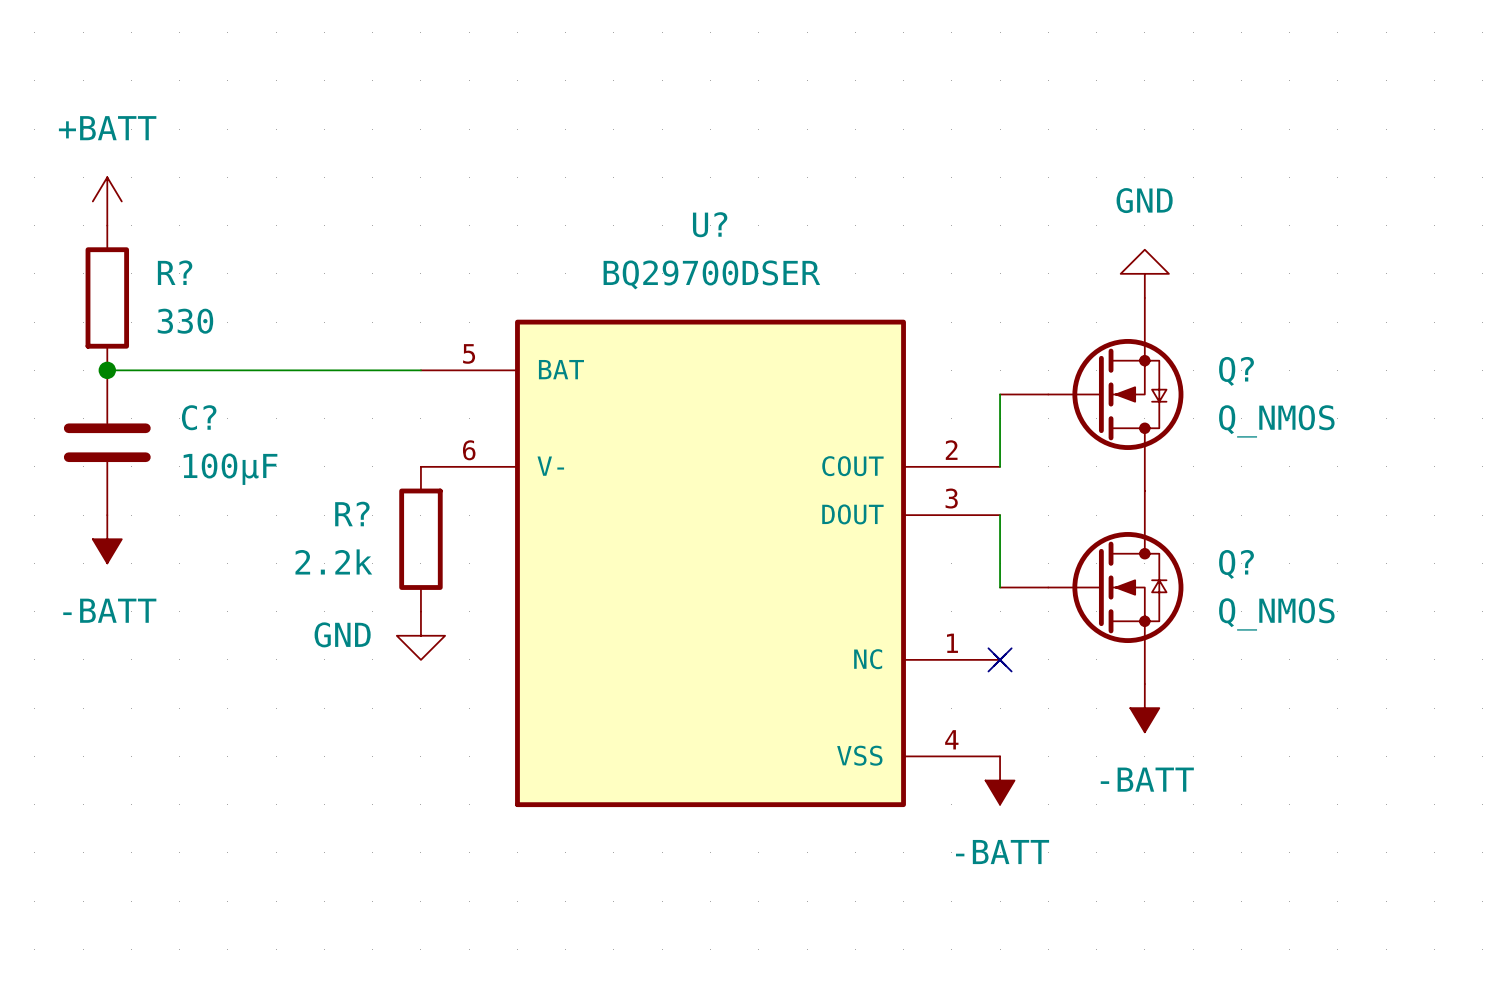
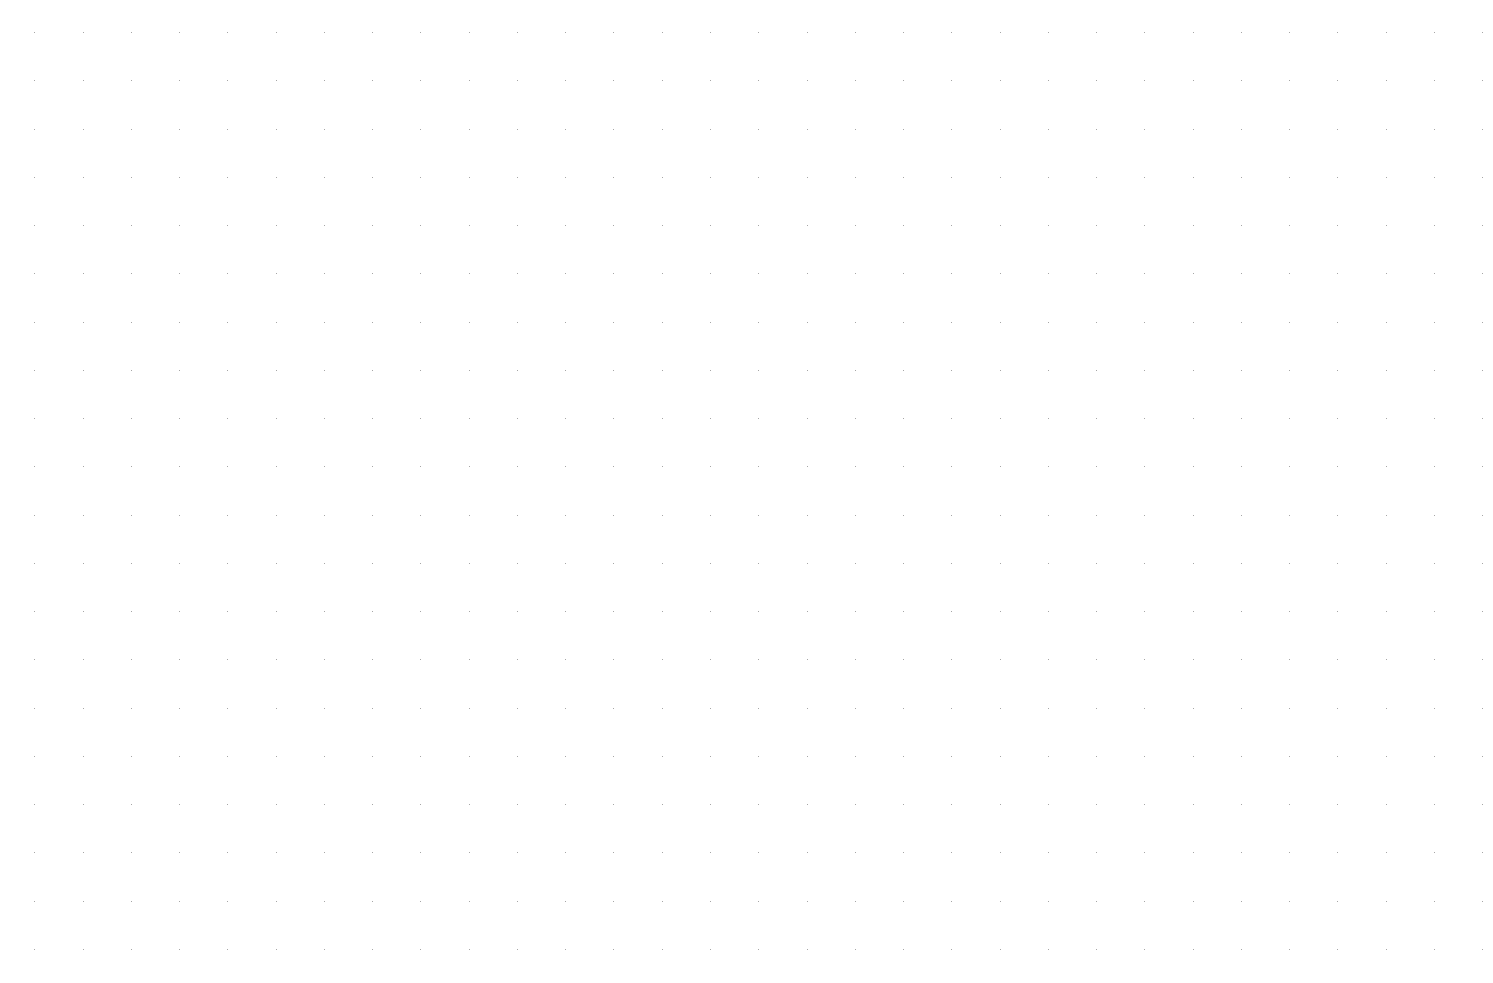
power symbol: +BATT (107, 201) -> none
power symbol: GND (1144, 273) -> none
R?: 330 (107, 297) -> none
wire: (107, 370) (420, 370) -> none
junction: (107, 370) -> none
wire: (1000, 394) (1000, 466) -> none
Q?: Q_NMOS (1091, 394) -> none
C?: 100µF (107, 442) -> none
wire: (1000, 515) (1000, 587) -> none
power symbol: -BATT (107, 539) -> none
R?: 2.2k (420, 539) -> none
U?: BQ29700DSER (713, 563) -> none
Q?: Q_NMOS (1091, 587) -> none
power symbol: GND (420, 635) -> none
no-connect mark: (1000, 659) -> none
power symbol: -BATT (1144, 708) -> none
power symbol: -BATT (1000, 780) -> none

